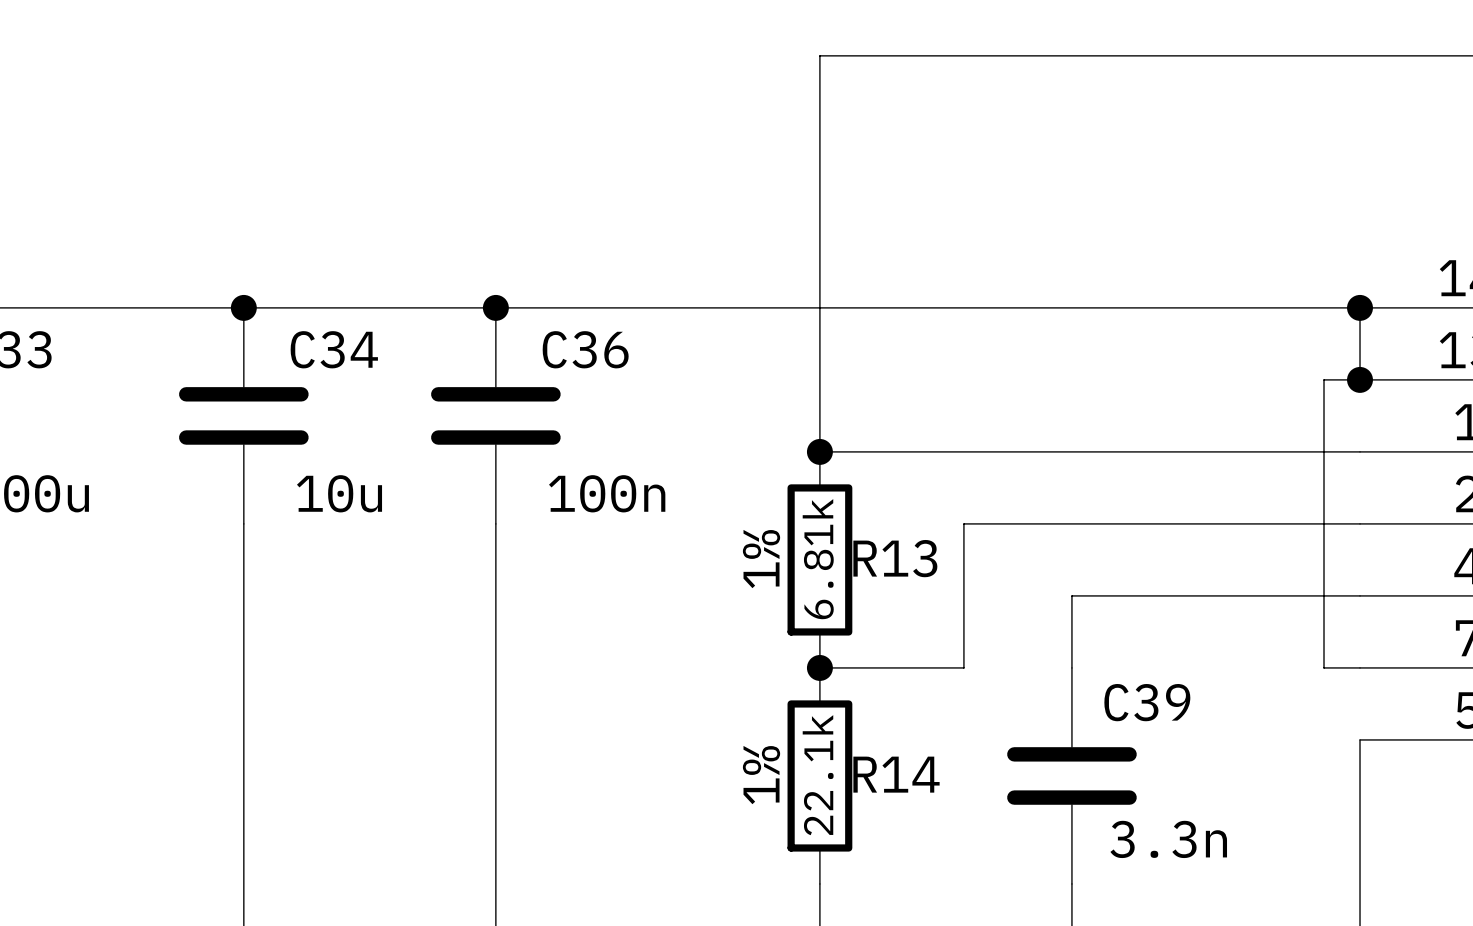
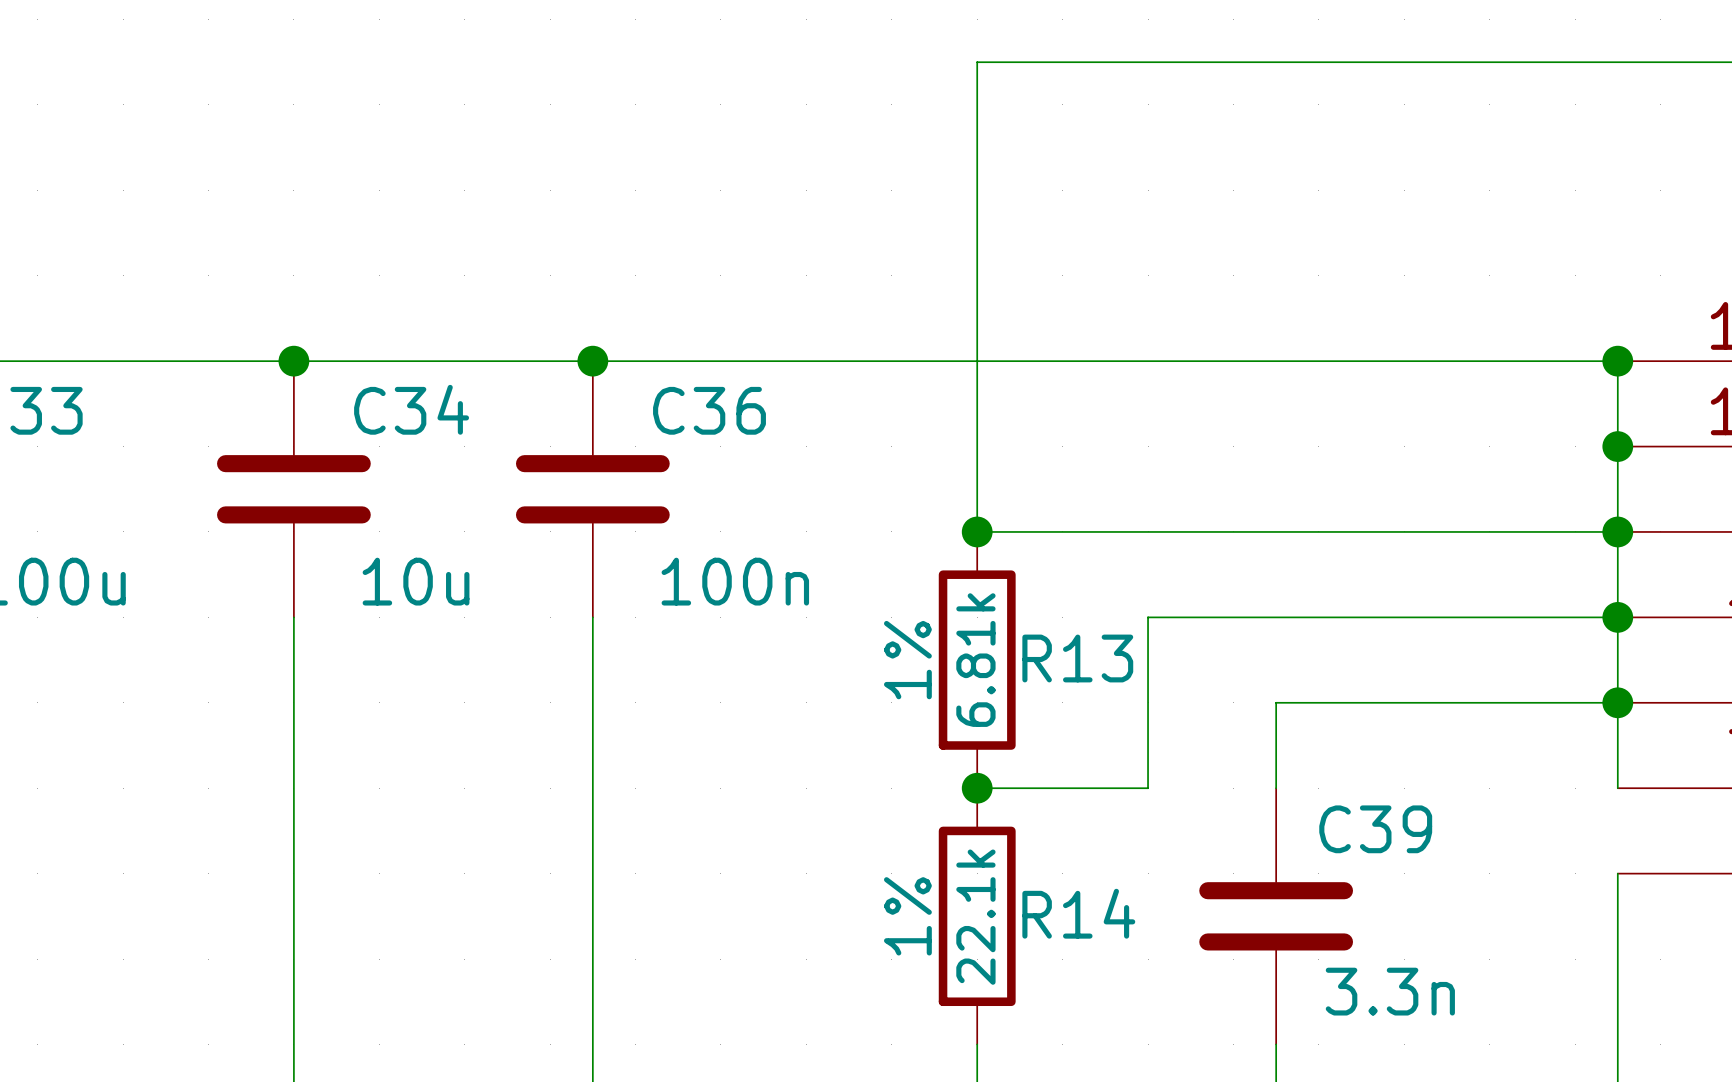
wire: (1360, 379) (1324, 379) (1324, 667) (1360, 667) -> (1617, 446) (1617, 788)
junction: none -> (1617, 531)
junction: none -> (1617, 617)
junction: none -> (1617, 702)

